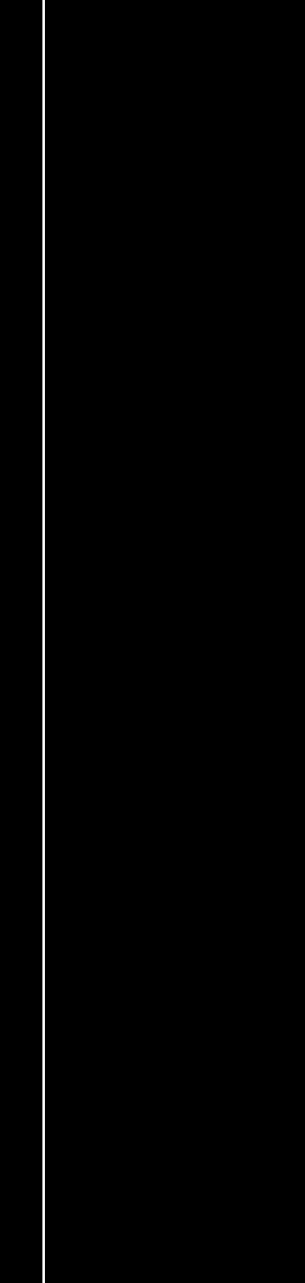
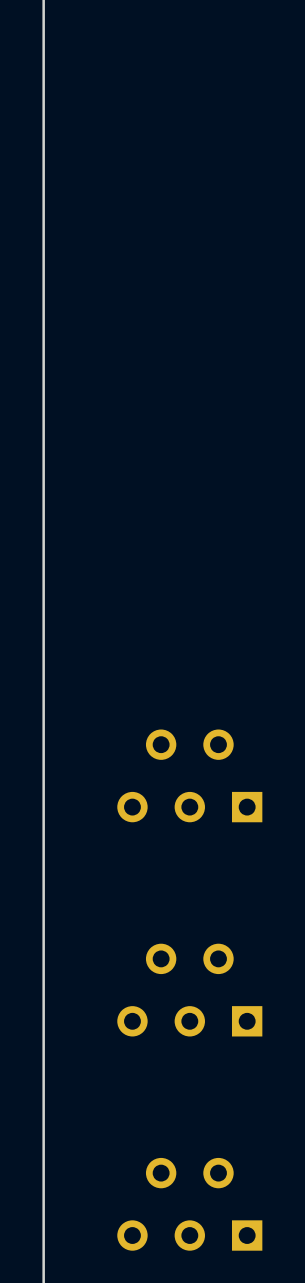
part: none -> (189, 775)
part: none -> (189, 990)
part: none -> (189, 1204)

